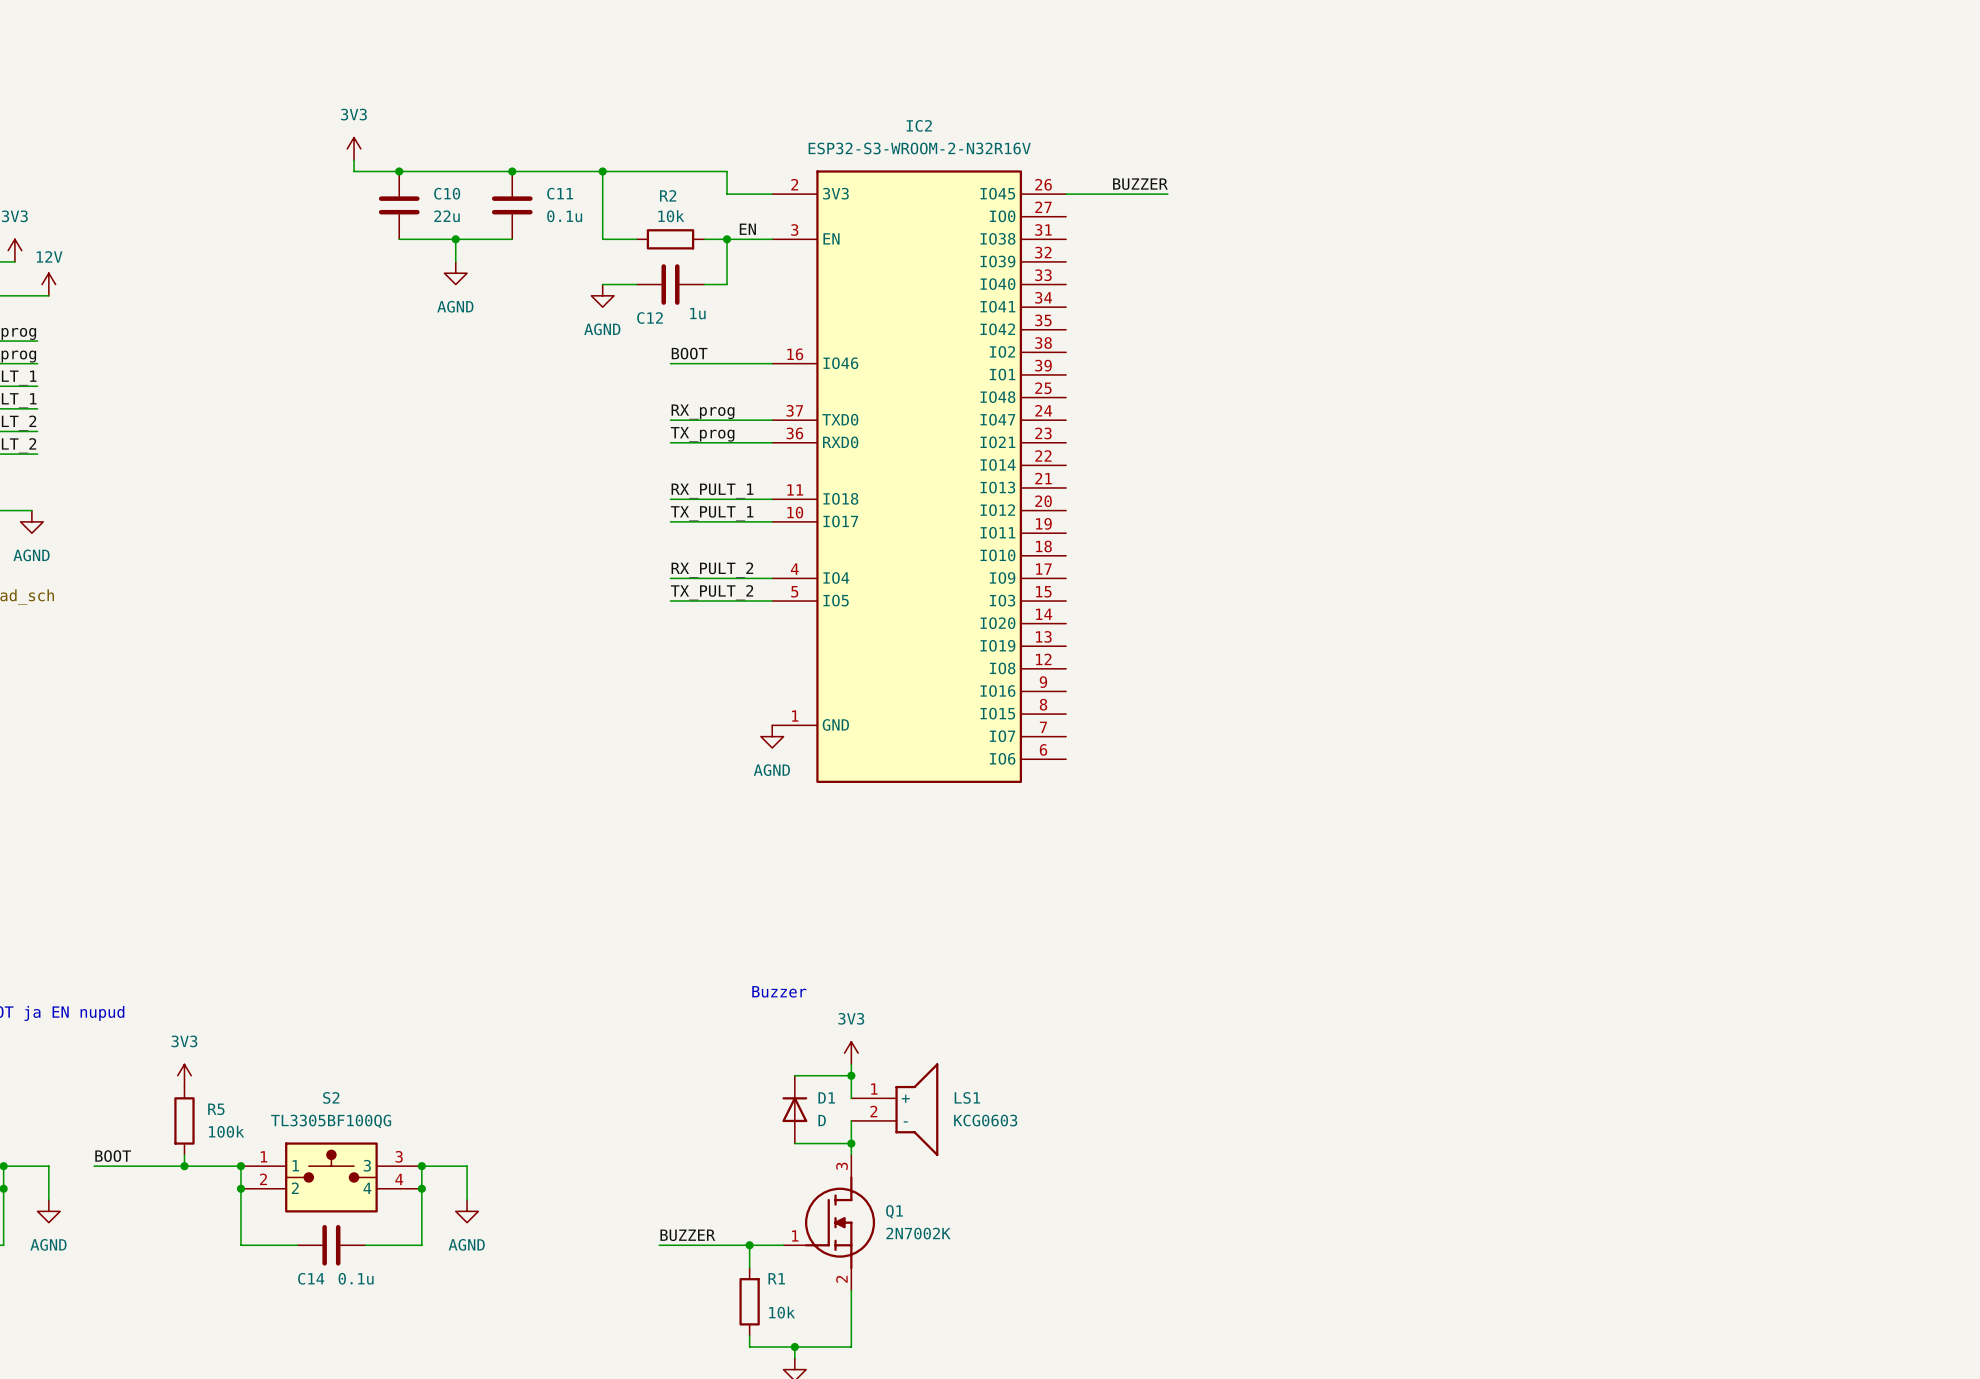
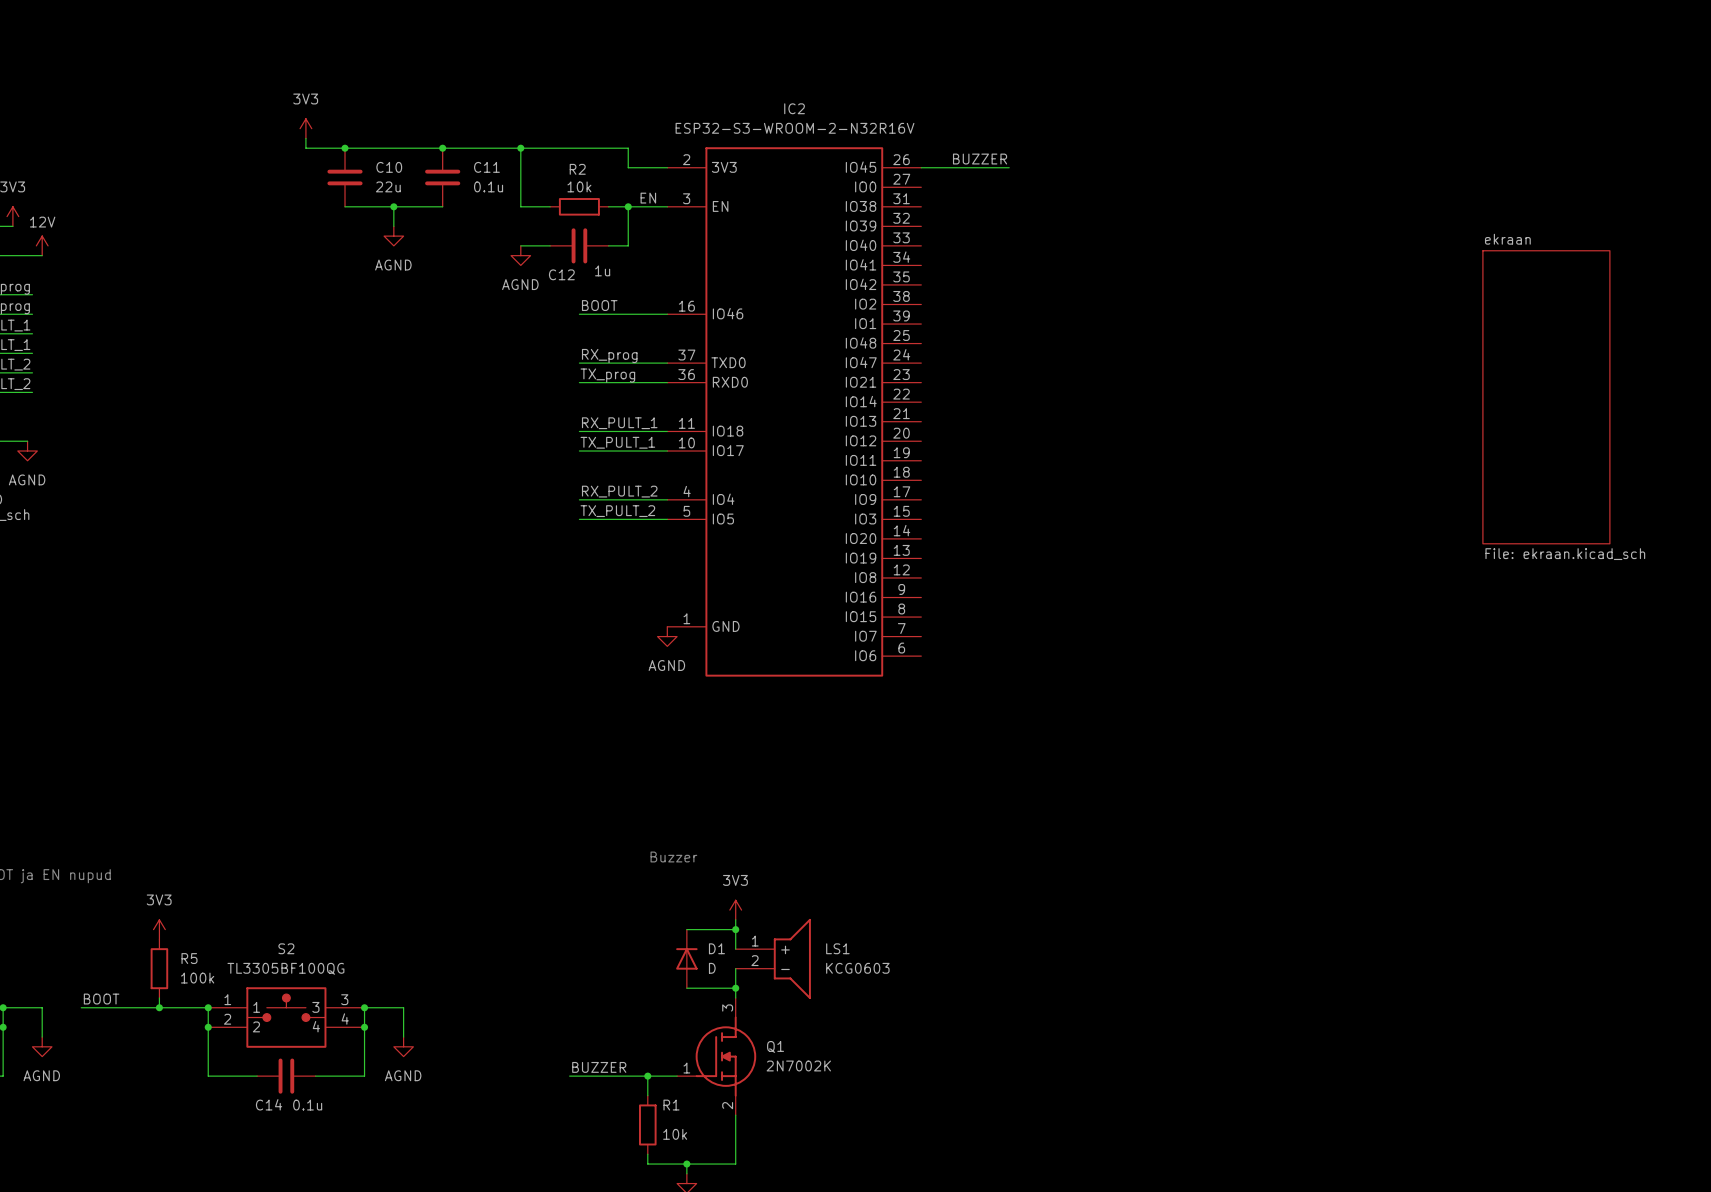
sheet ekraan: none -> File: ekraan.kicad_sch (1546, 397)

